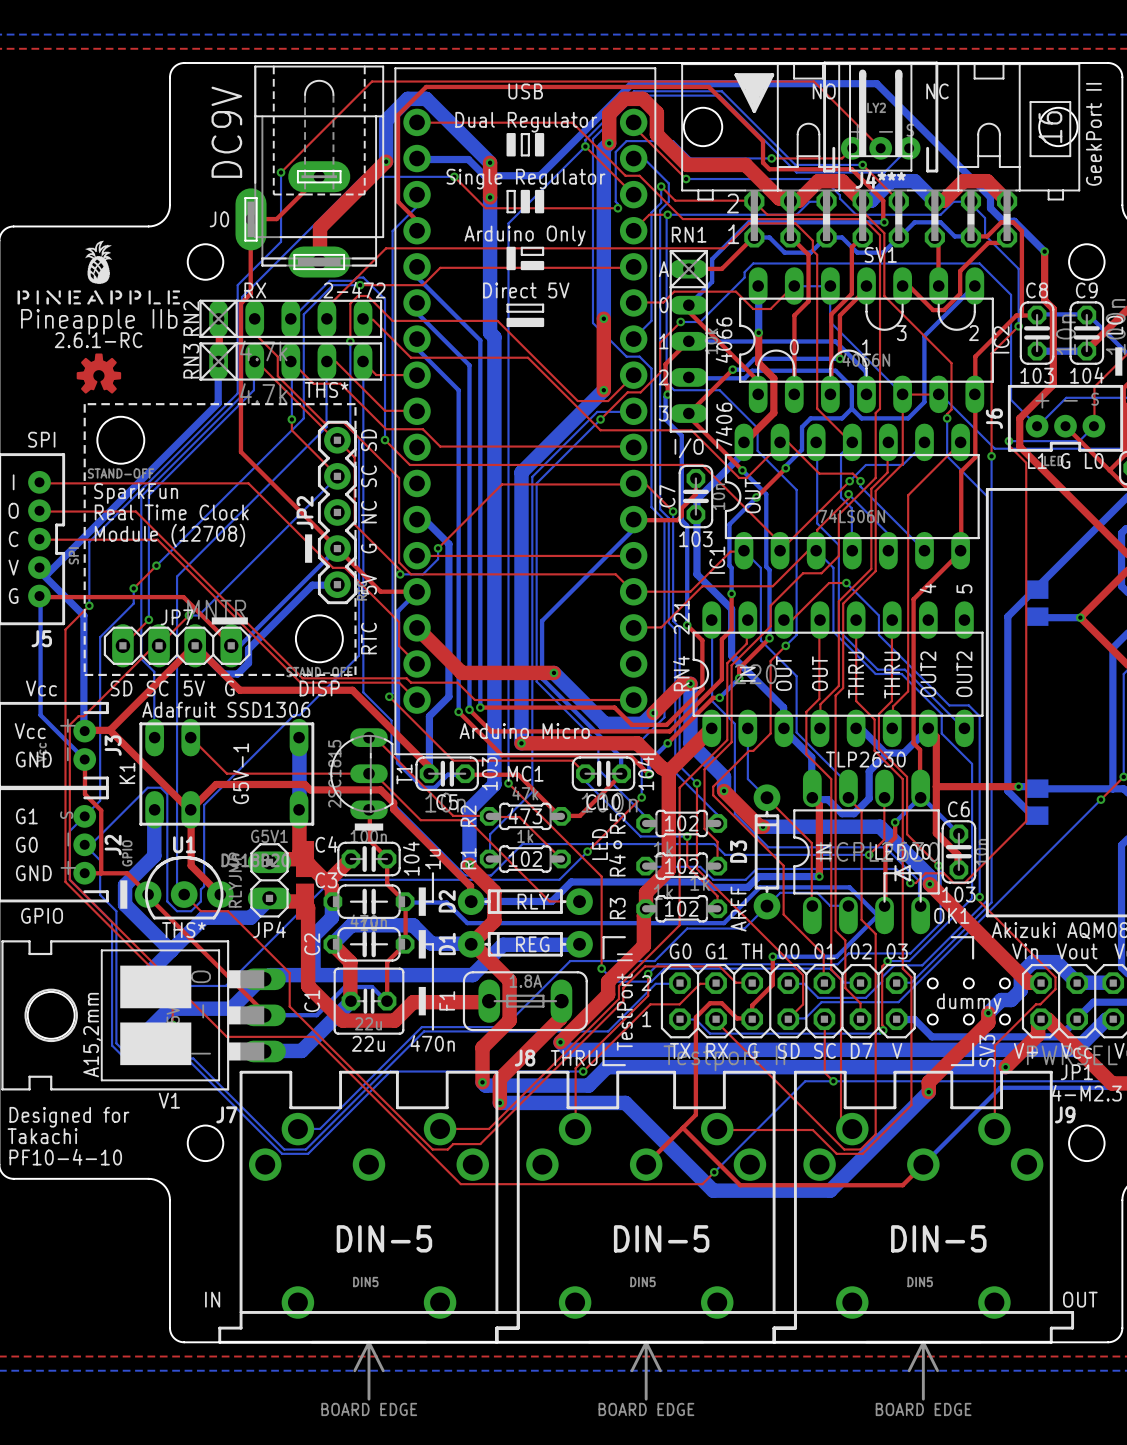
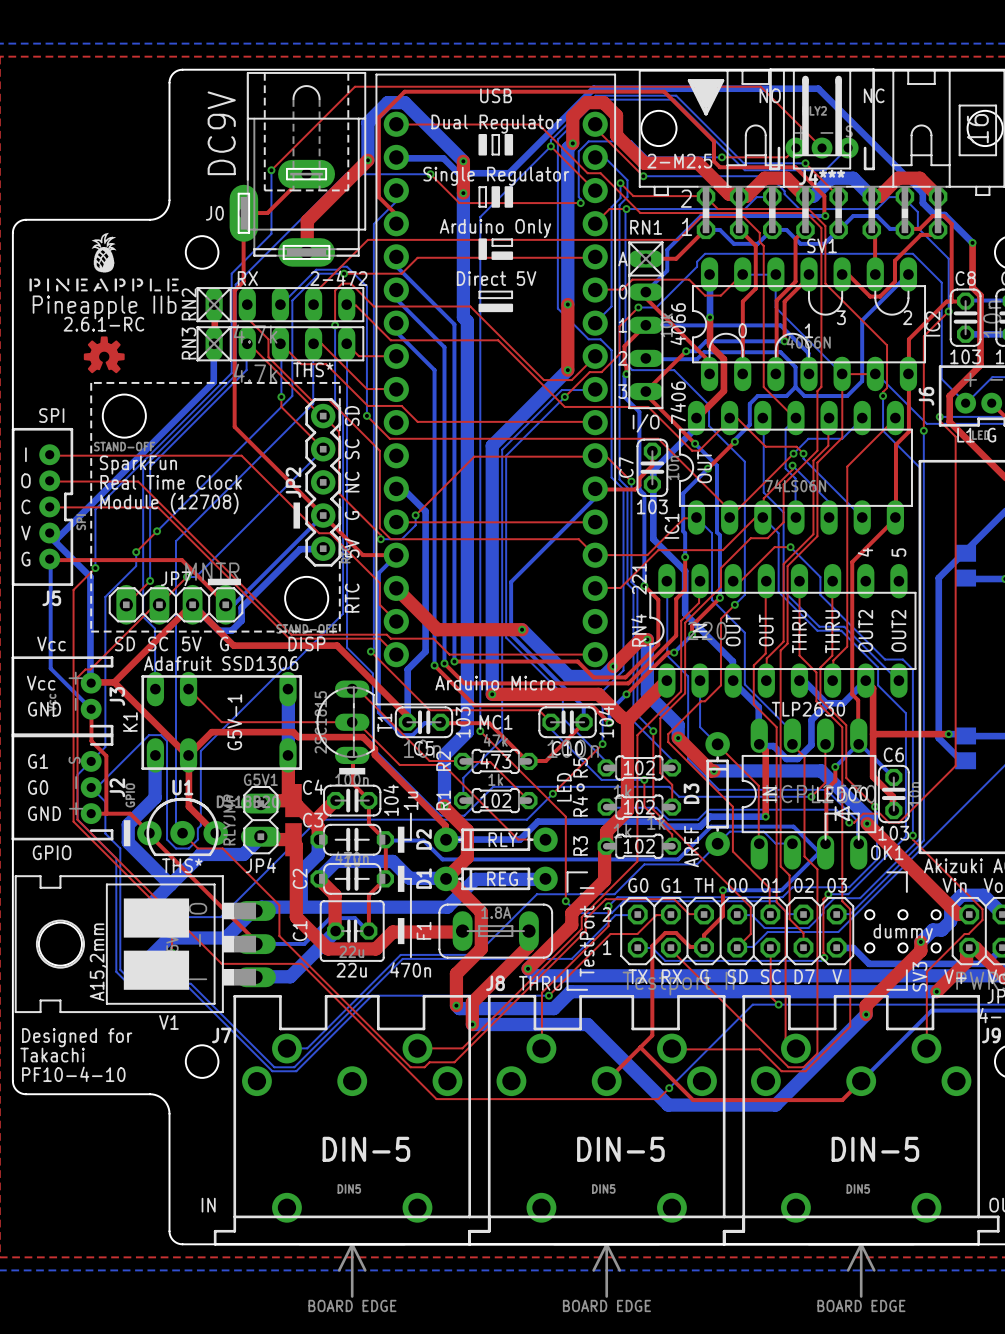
text: none -> 2-M2.5 (679, 161)

